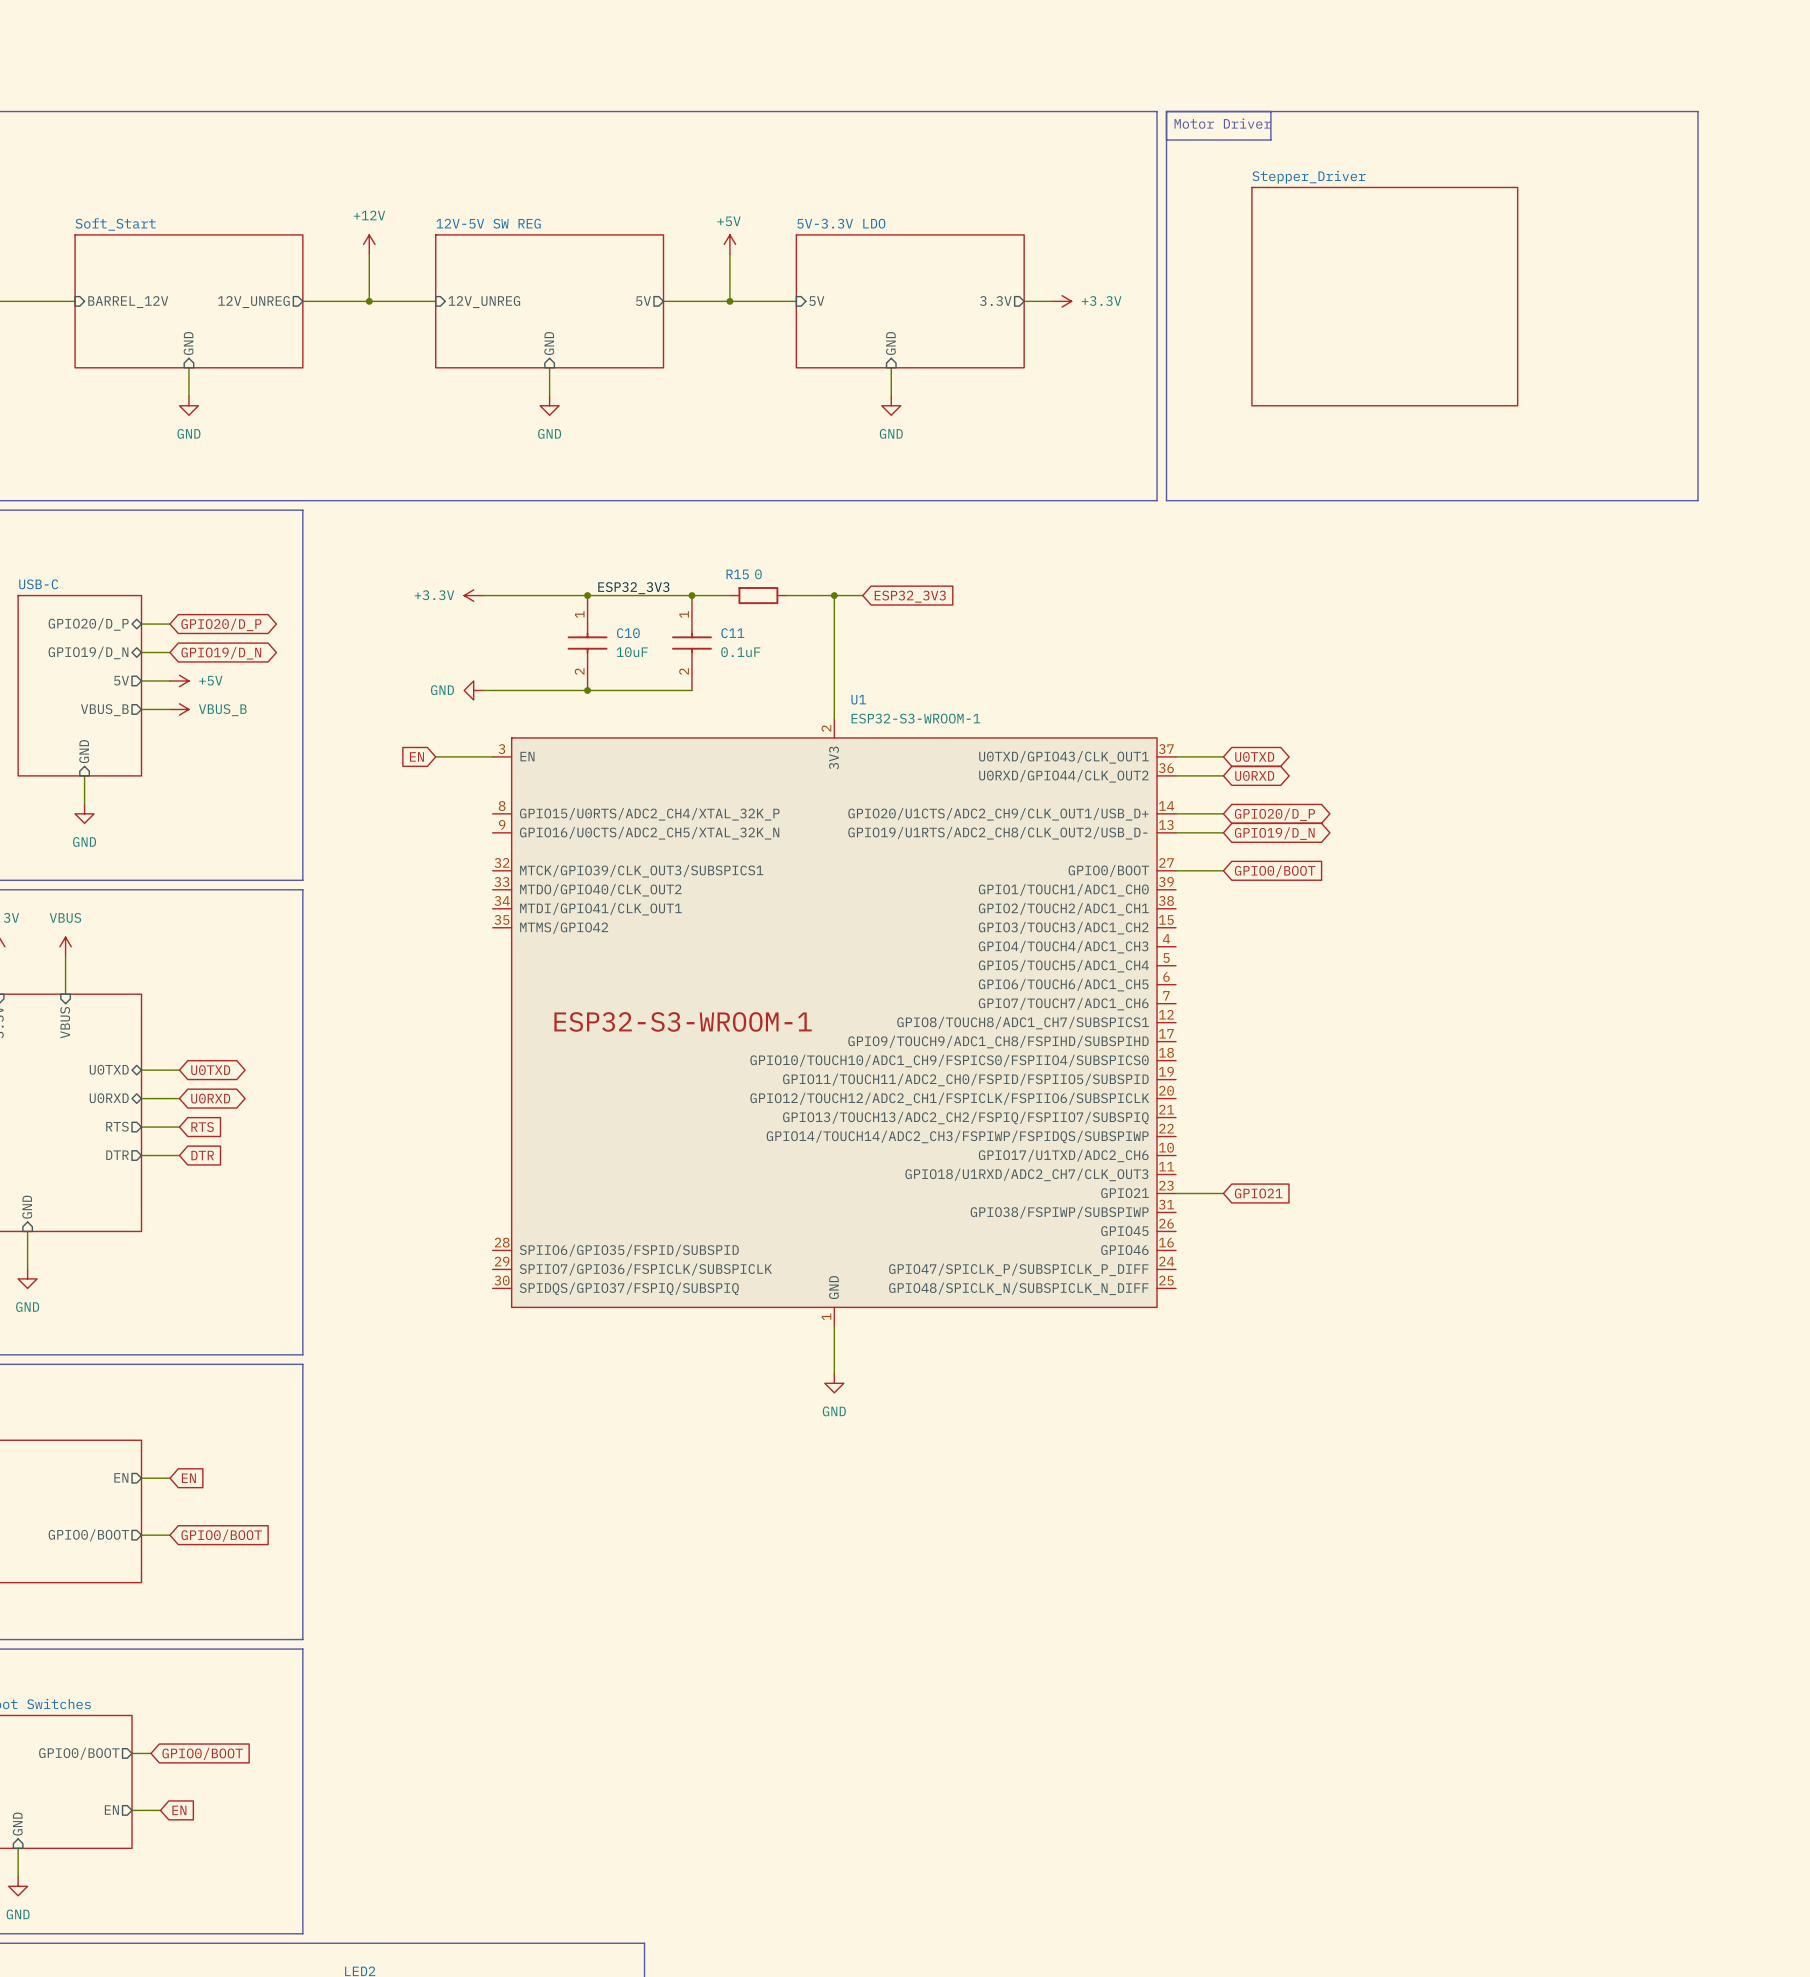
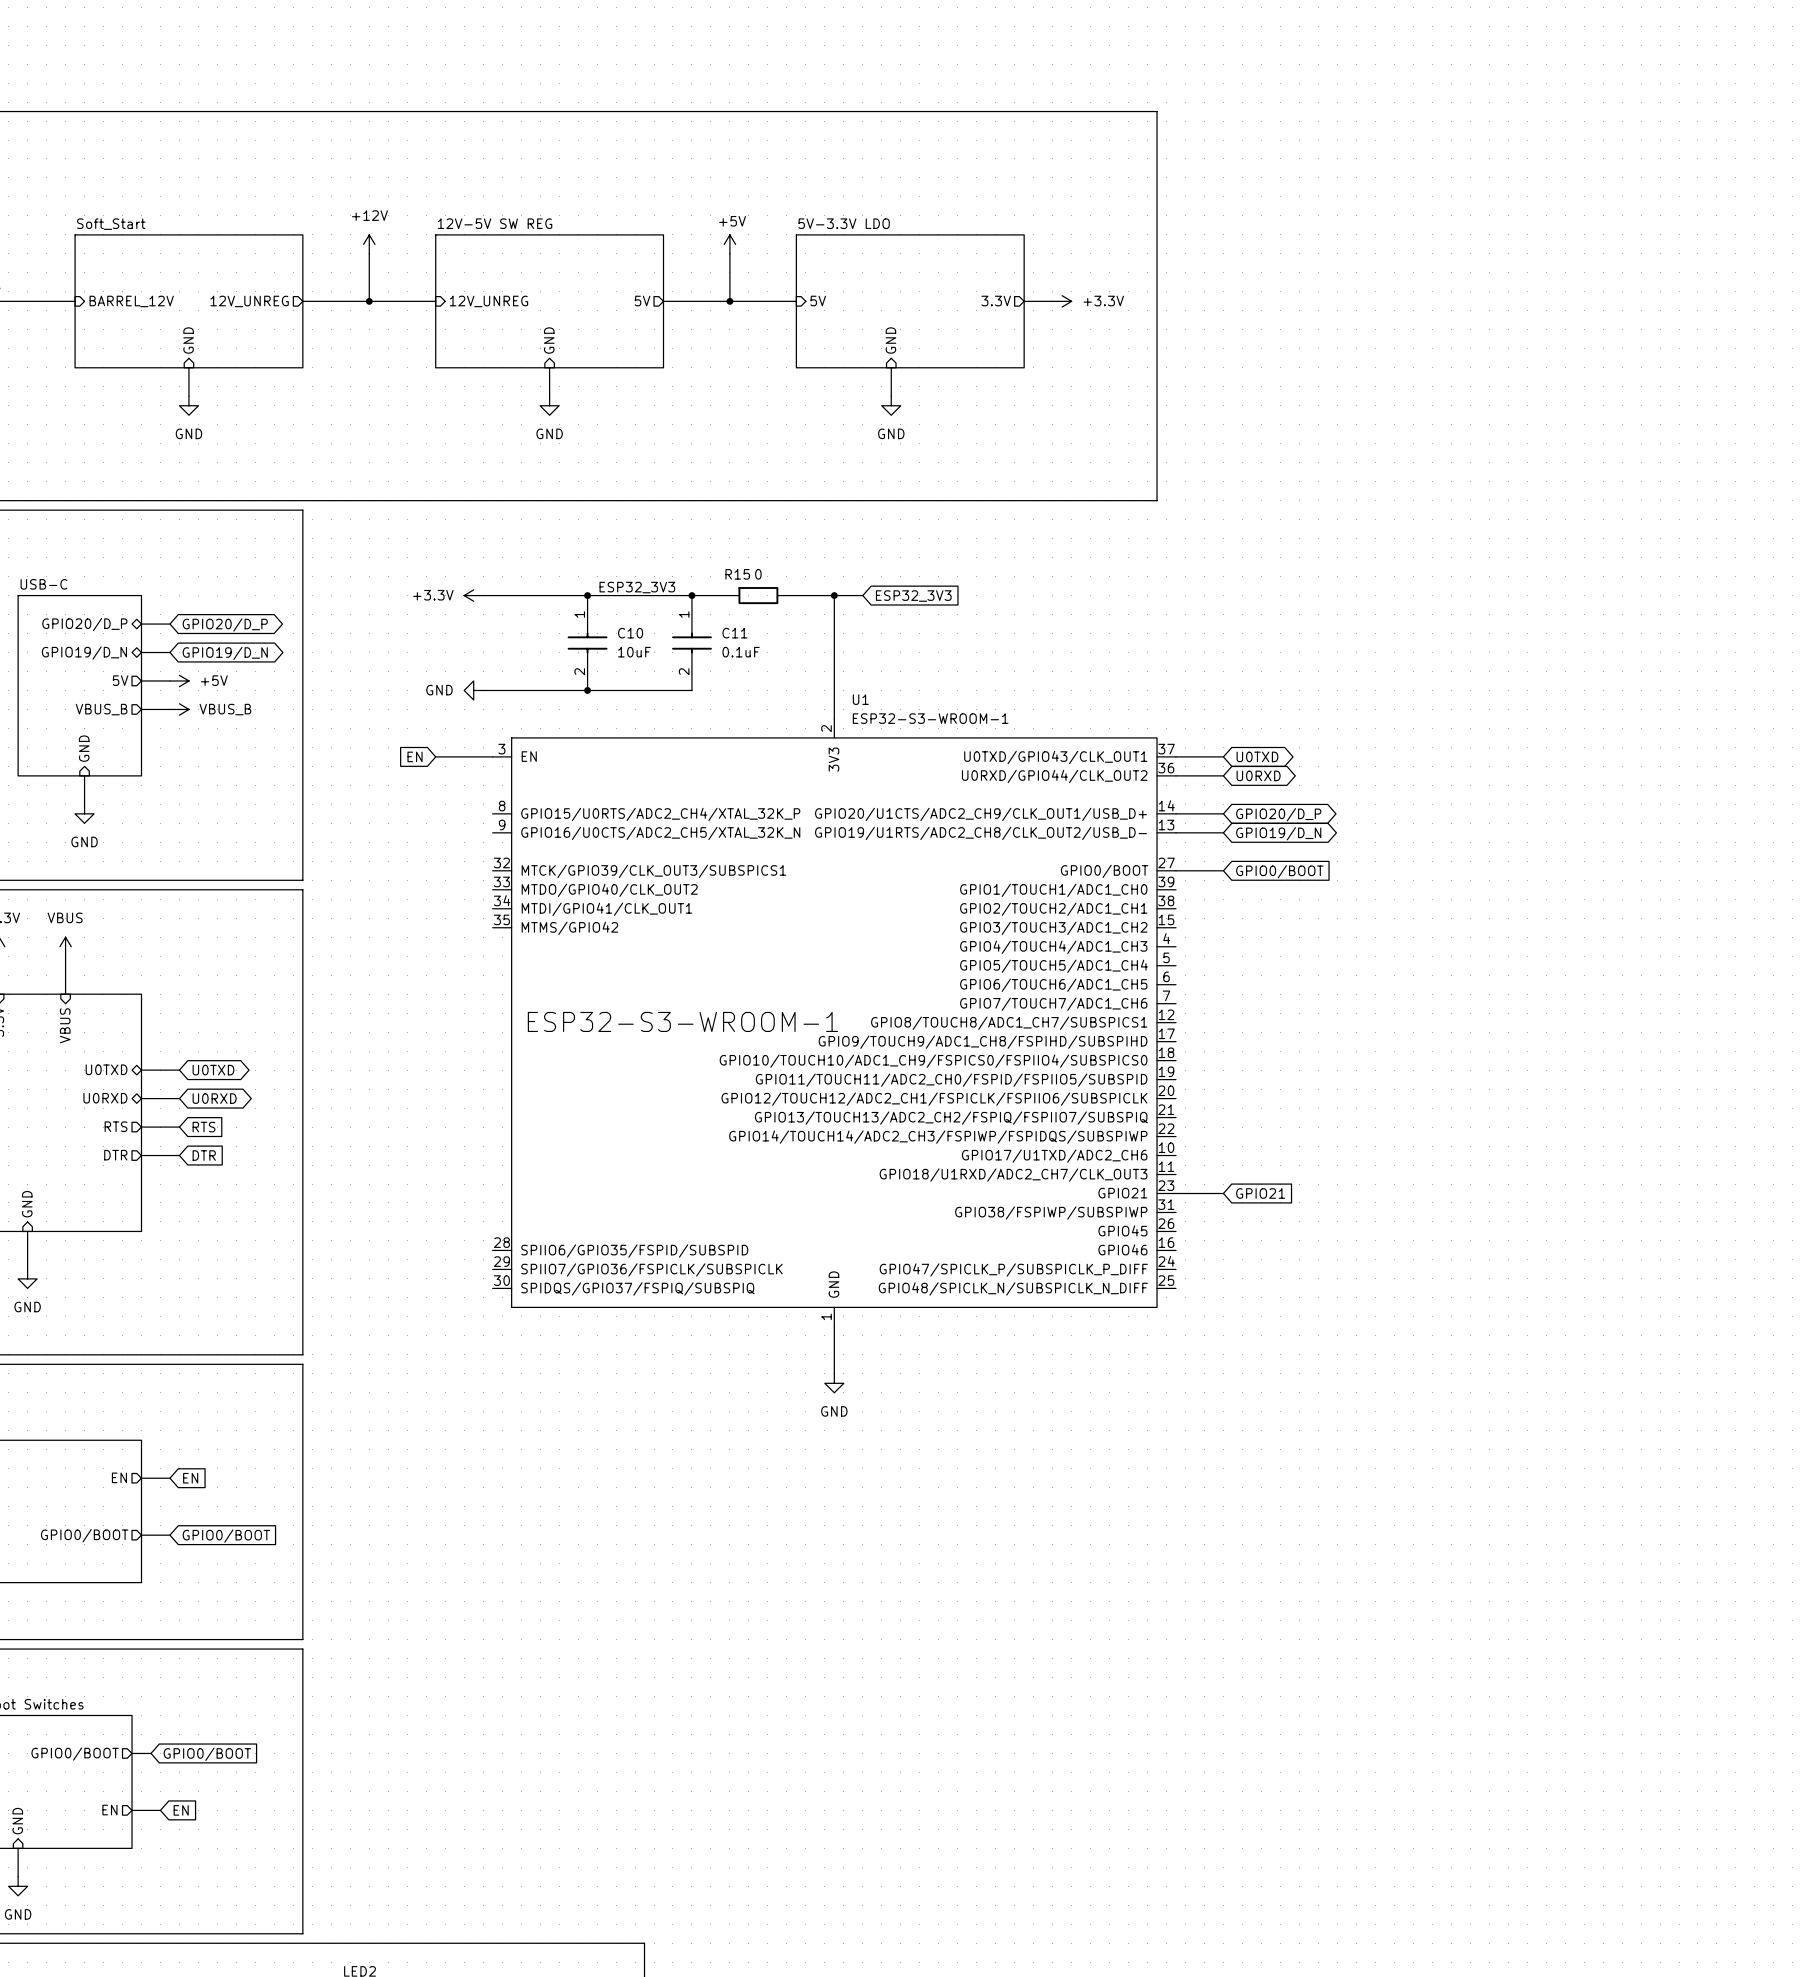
line: (1166, 111) (1697, 111) (1697, 500) (1166, 500) (1166, 111) -> none
line: (1270, 111) (1270, 140) (1166, 140) -> none
text: Motor Driver (1222, 123) -> none
sheet Stepper_Driver: (1384, 296) -> none

